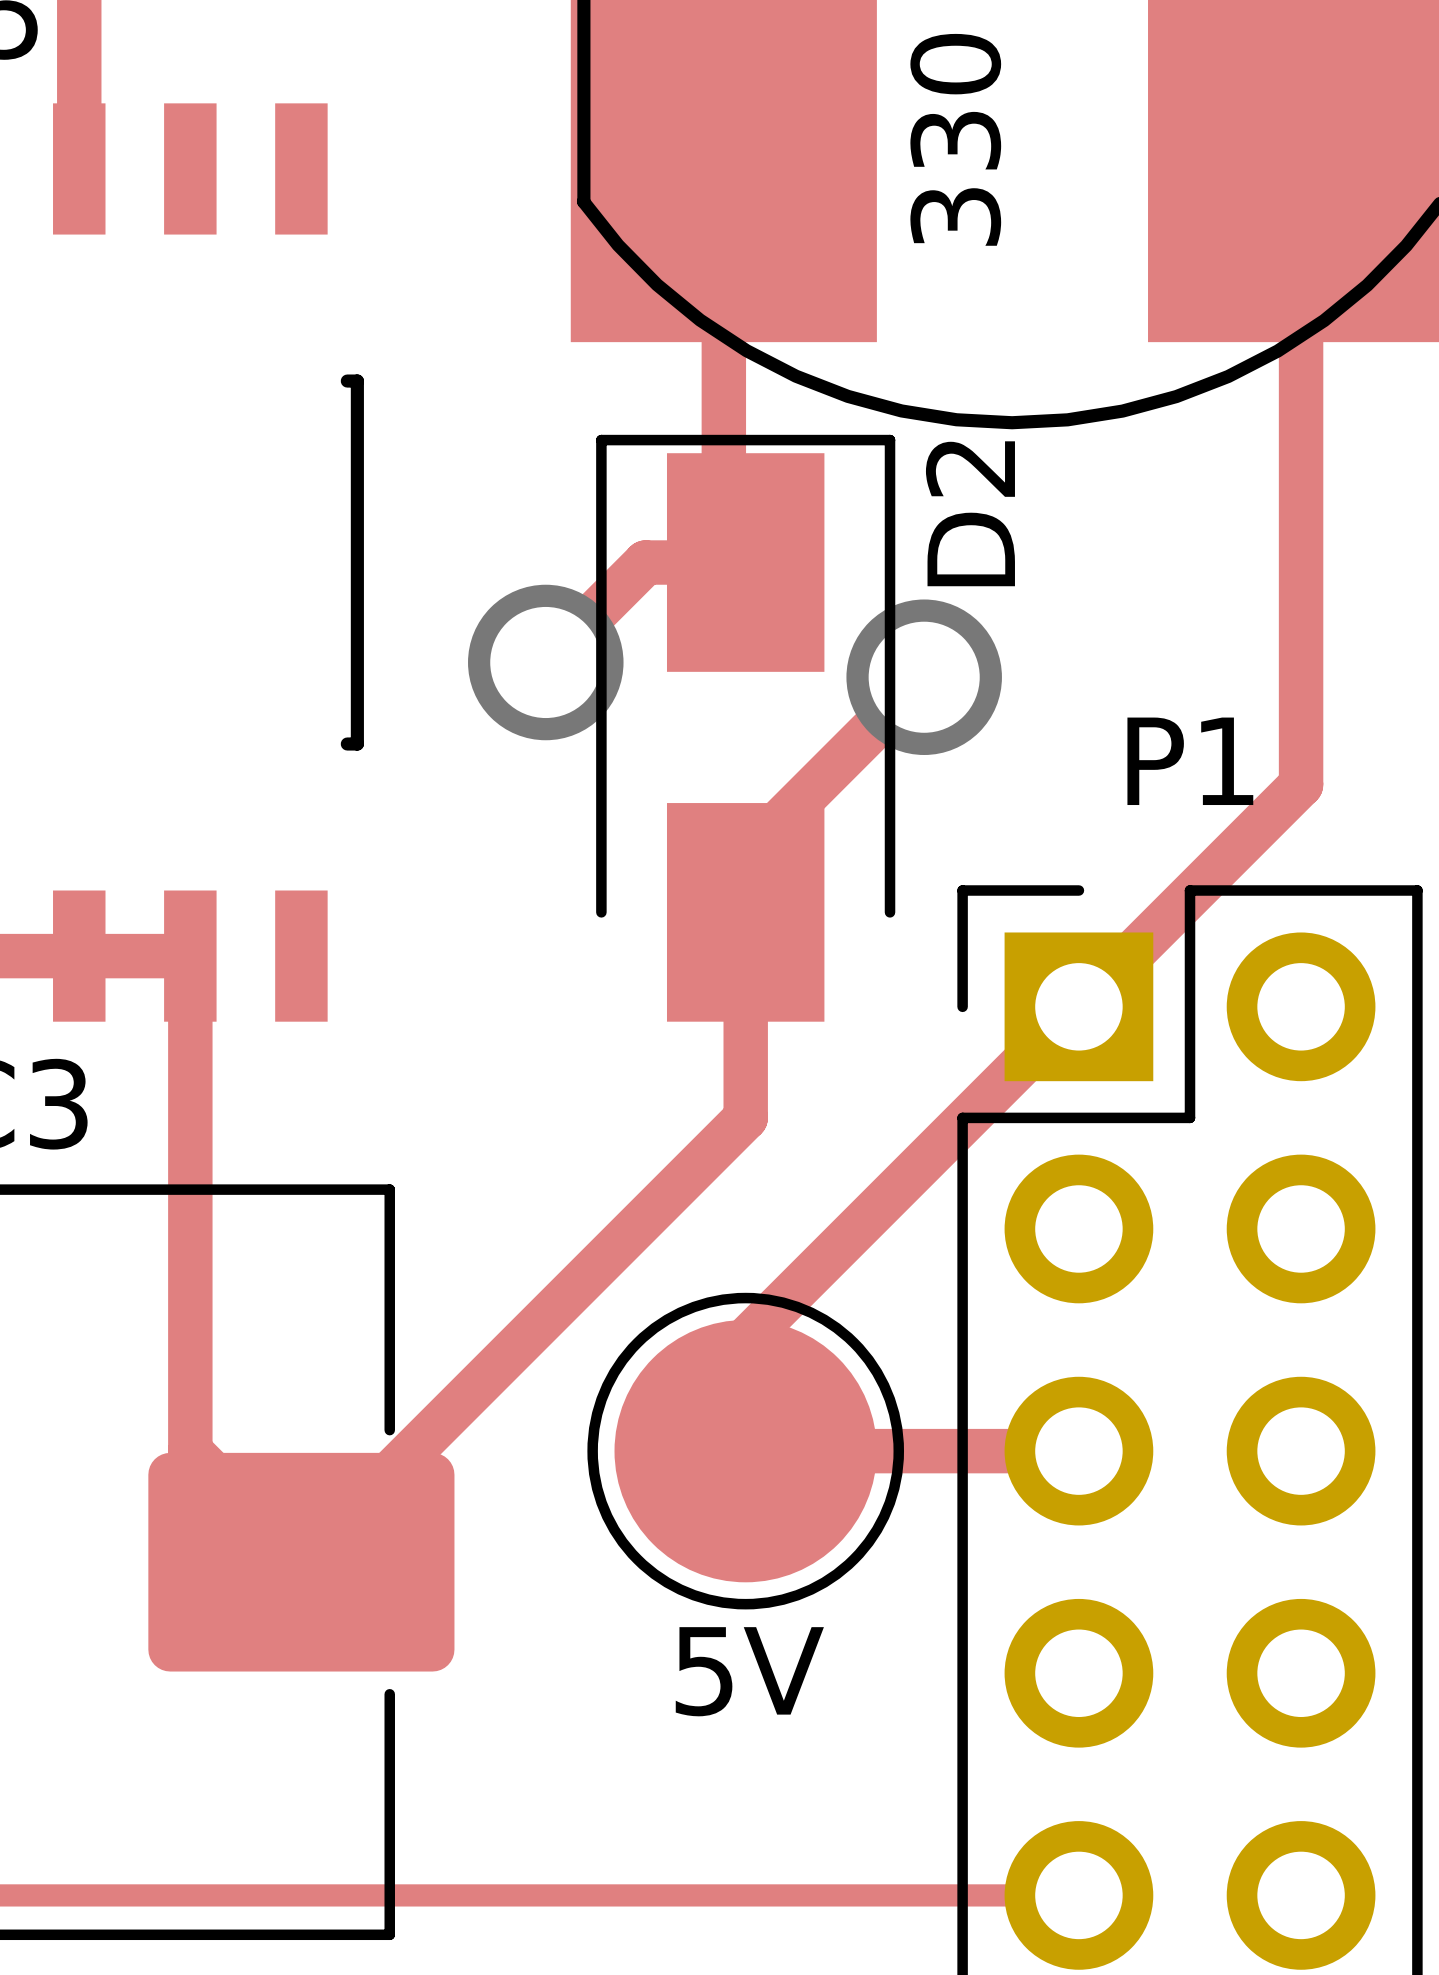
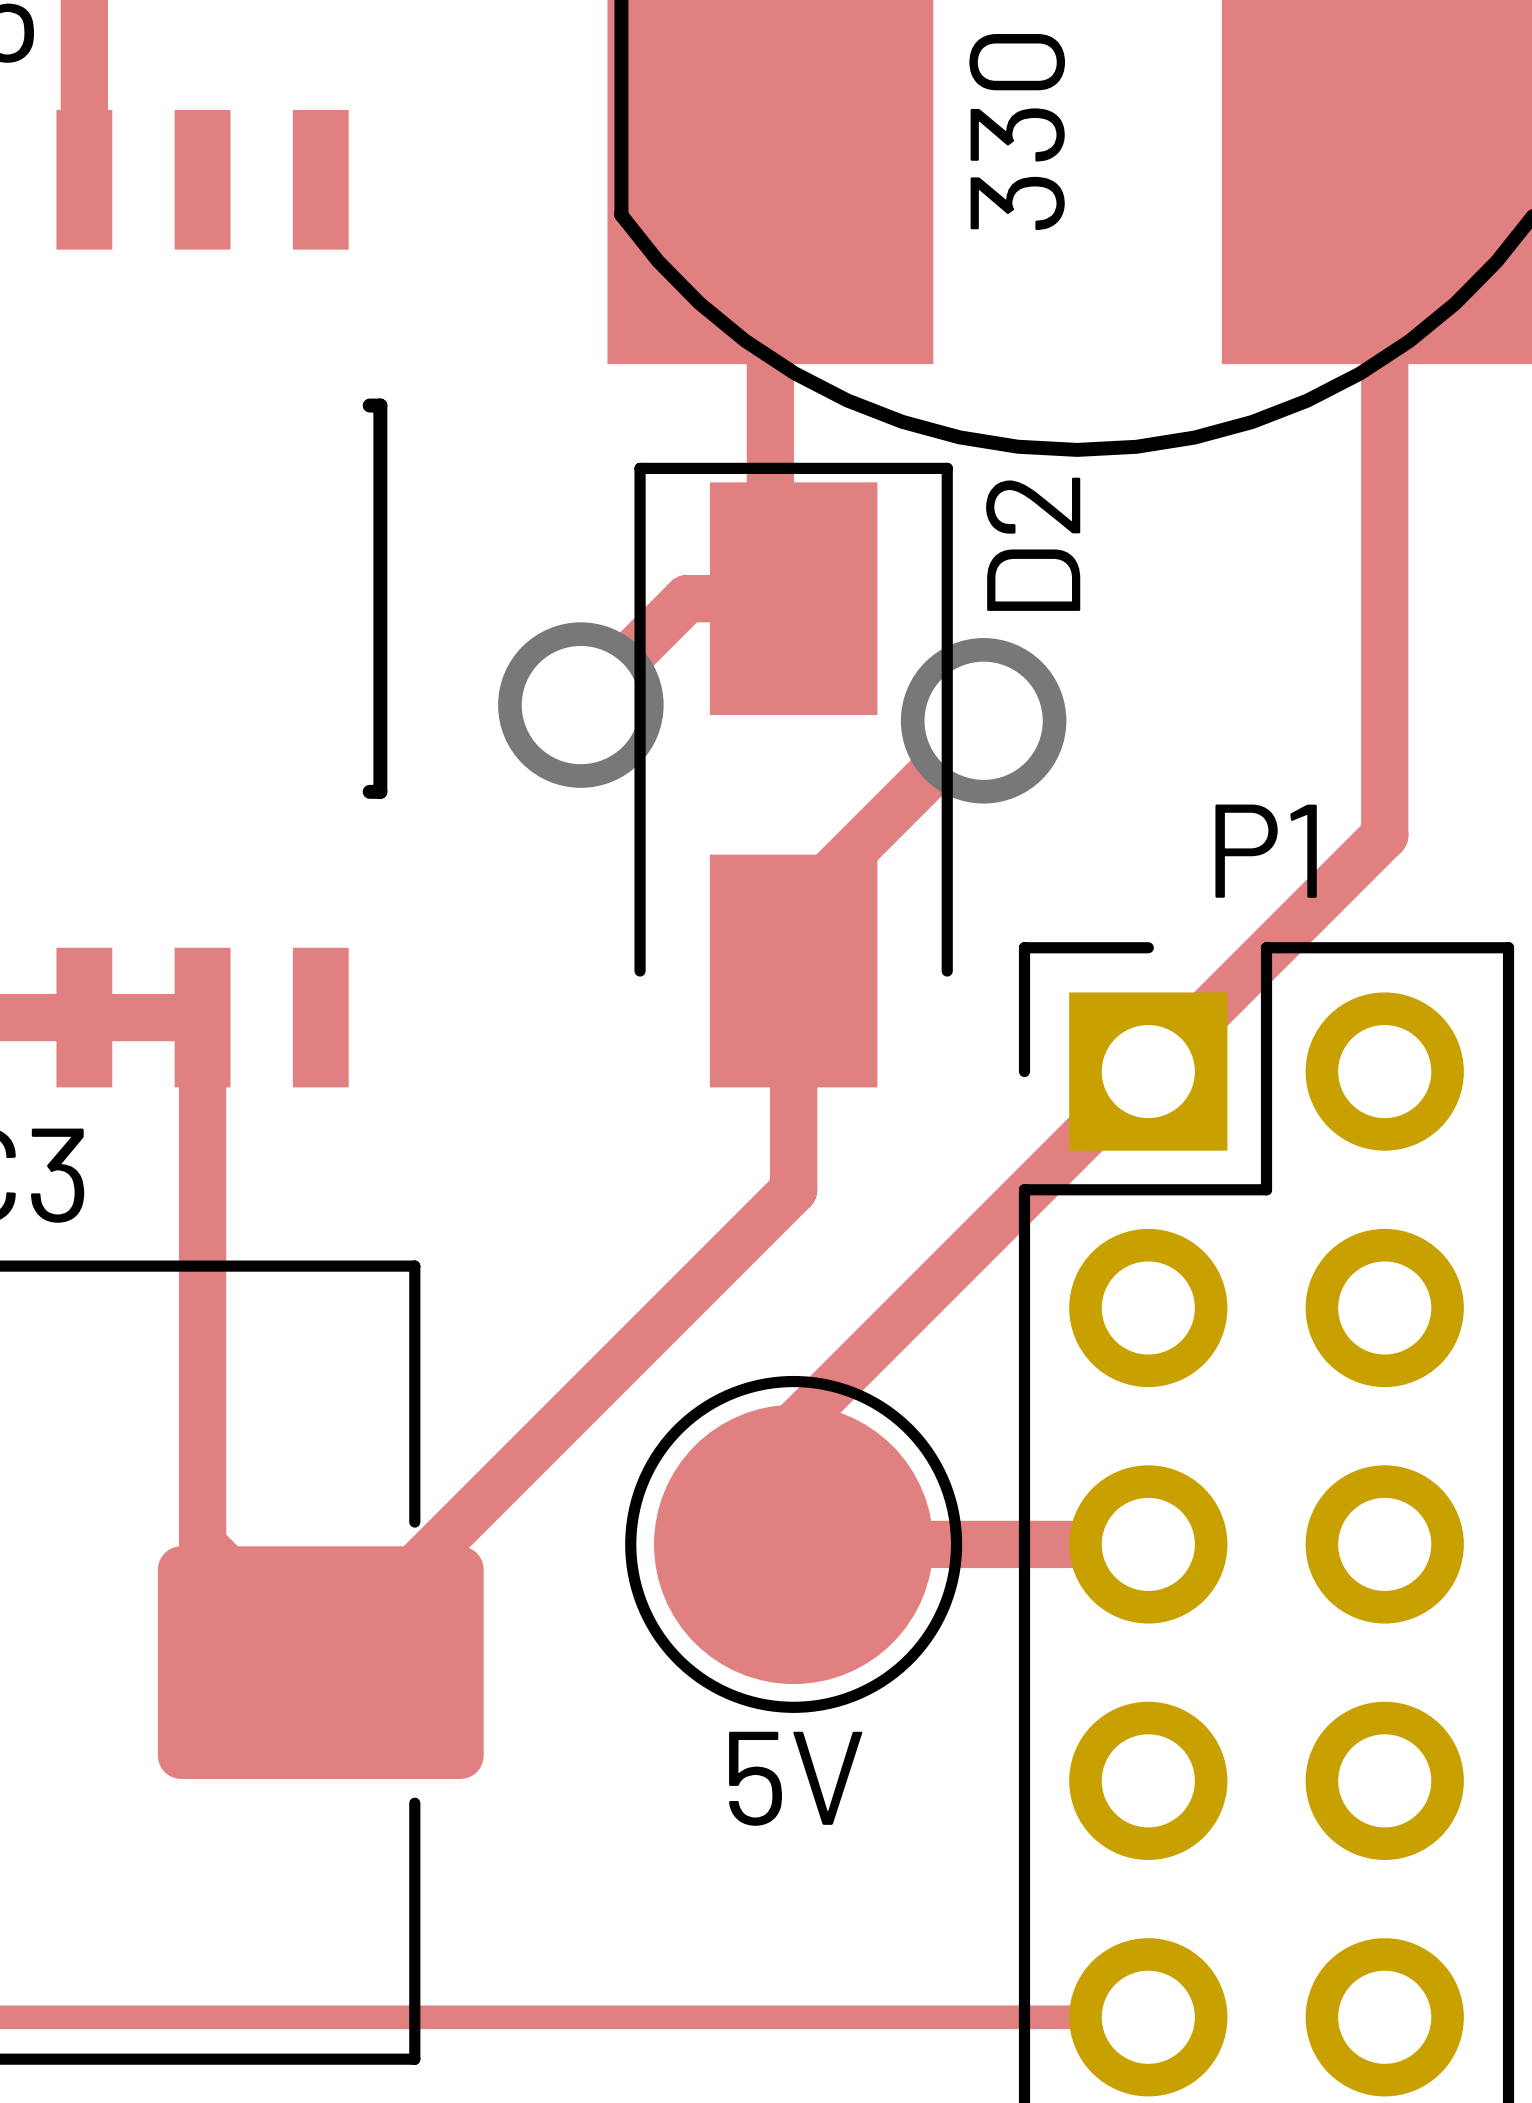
P1 name position: P1 (1190, 761) -> P1 (1266, 851)

